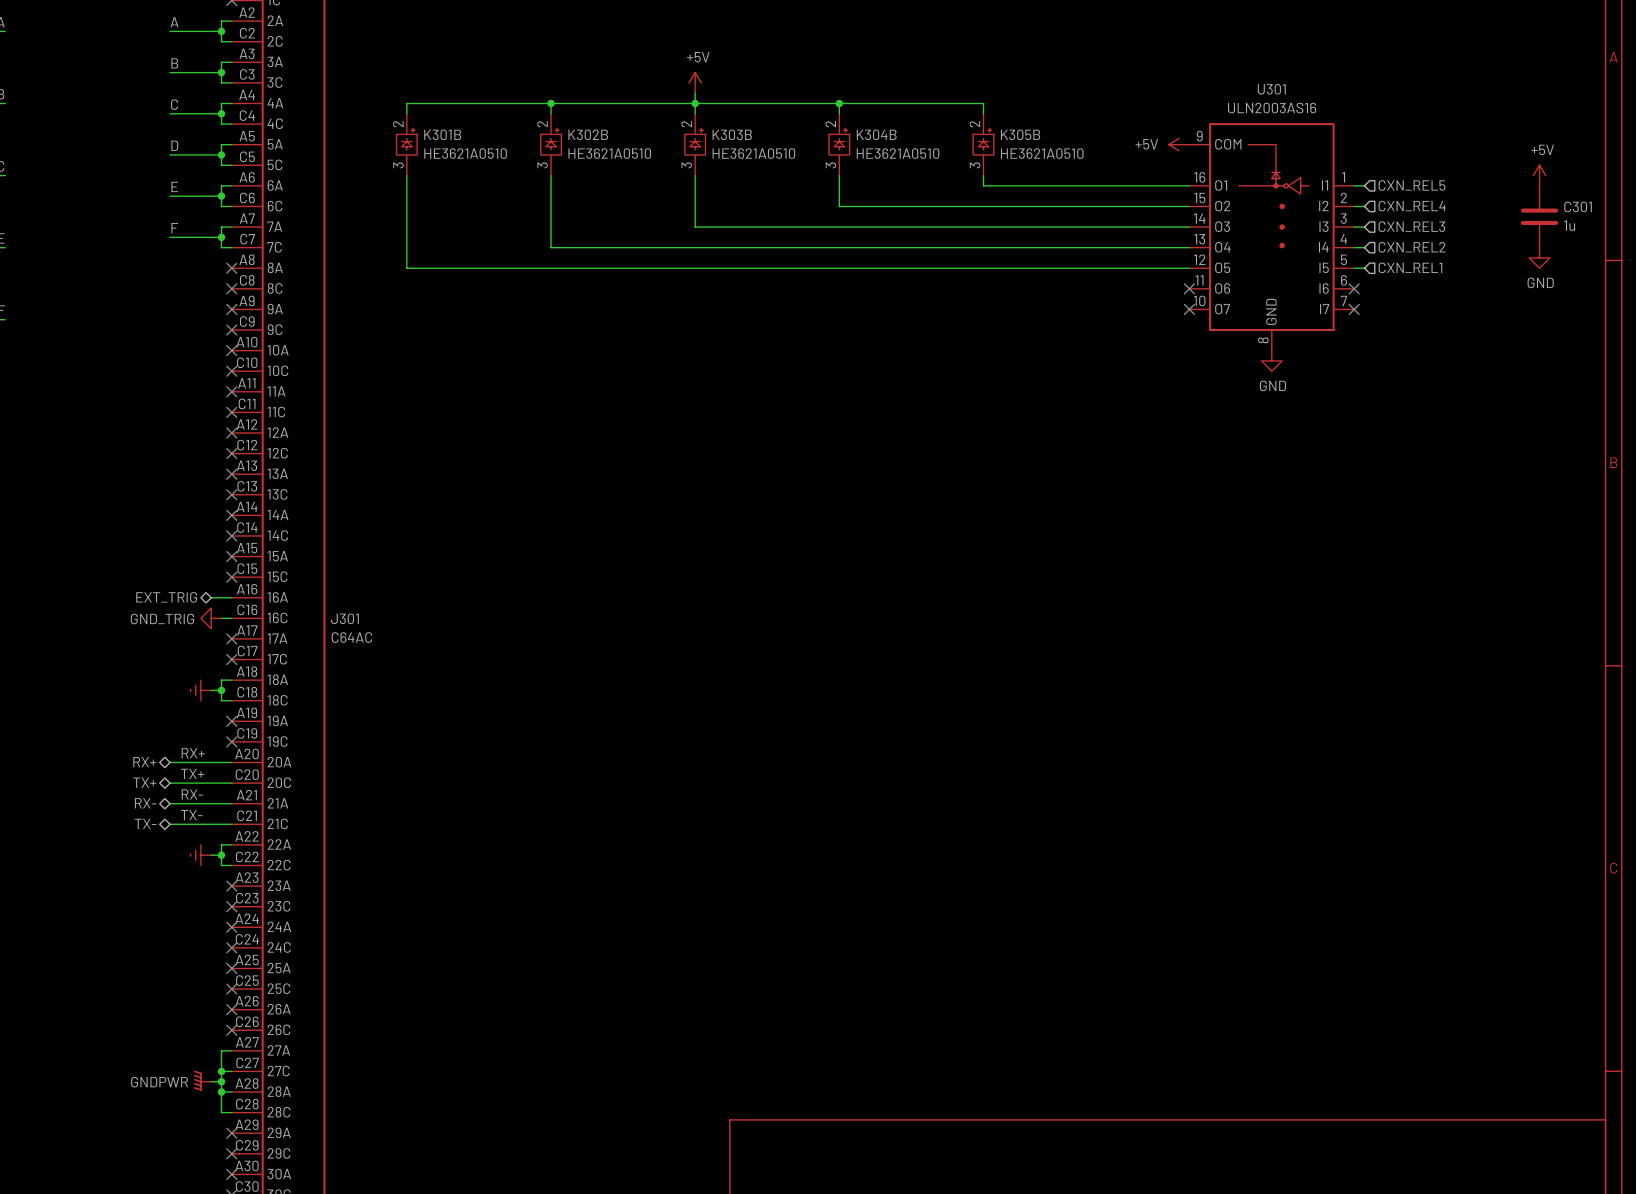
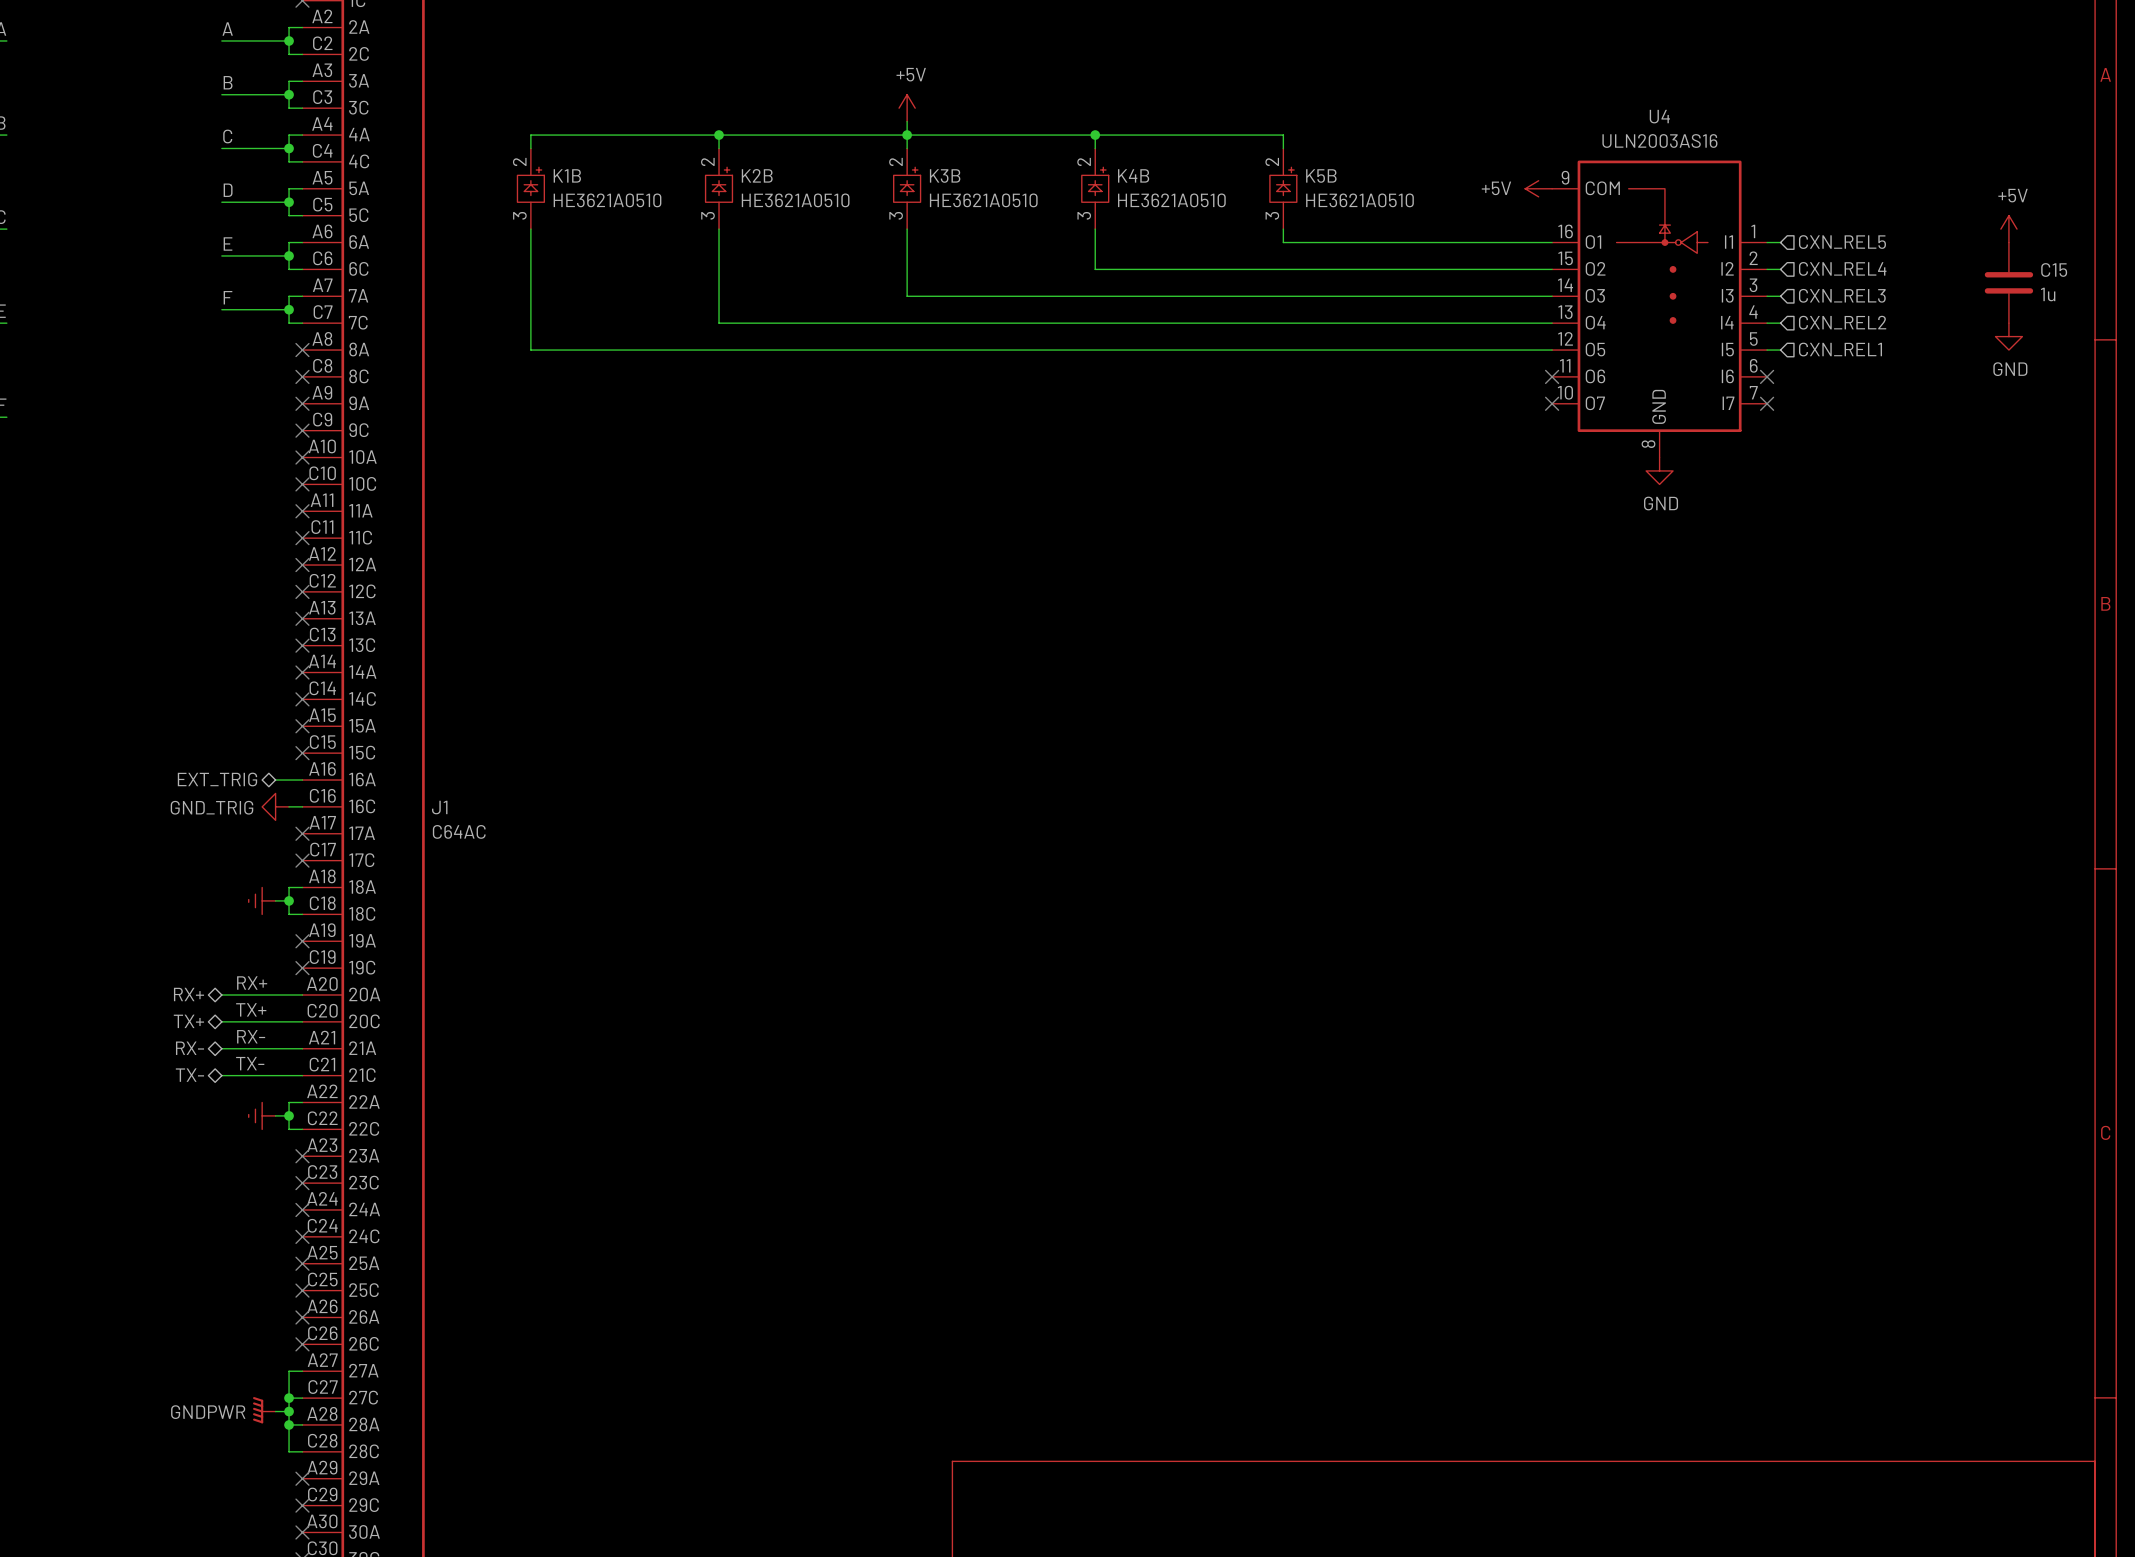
U301 name: U301 (1271, 89) -> U4 (1659, 116)
K301B name: K301B (442, 134) -> K1B (567, 175)
K302B name: K302B (588, 134) -> K2B (757, 175)
K303B name: K303B (732, 134) -> K3B (945, 176)
K304B name: K304B (876, 134) -> K4B (1133, 175)
K305B name: K305B (1020, 134) -> K5B (1321, 175)
C301 name: C301 (1578, 206) -> C15 (2054, 269)
J301 name: J301 (344, 618) -> J1 (439, 807)

